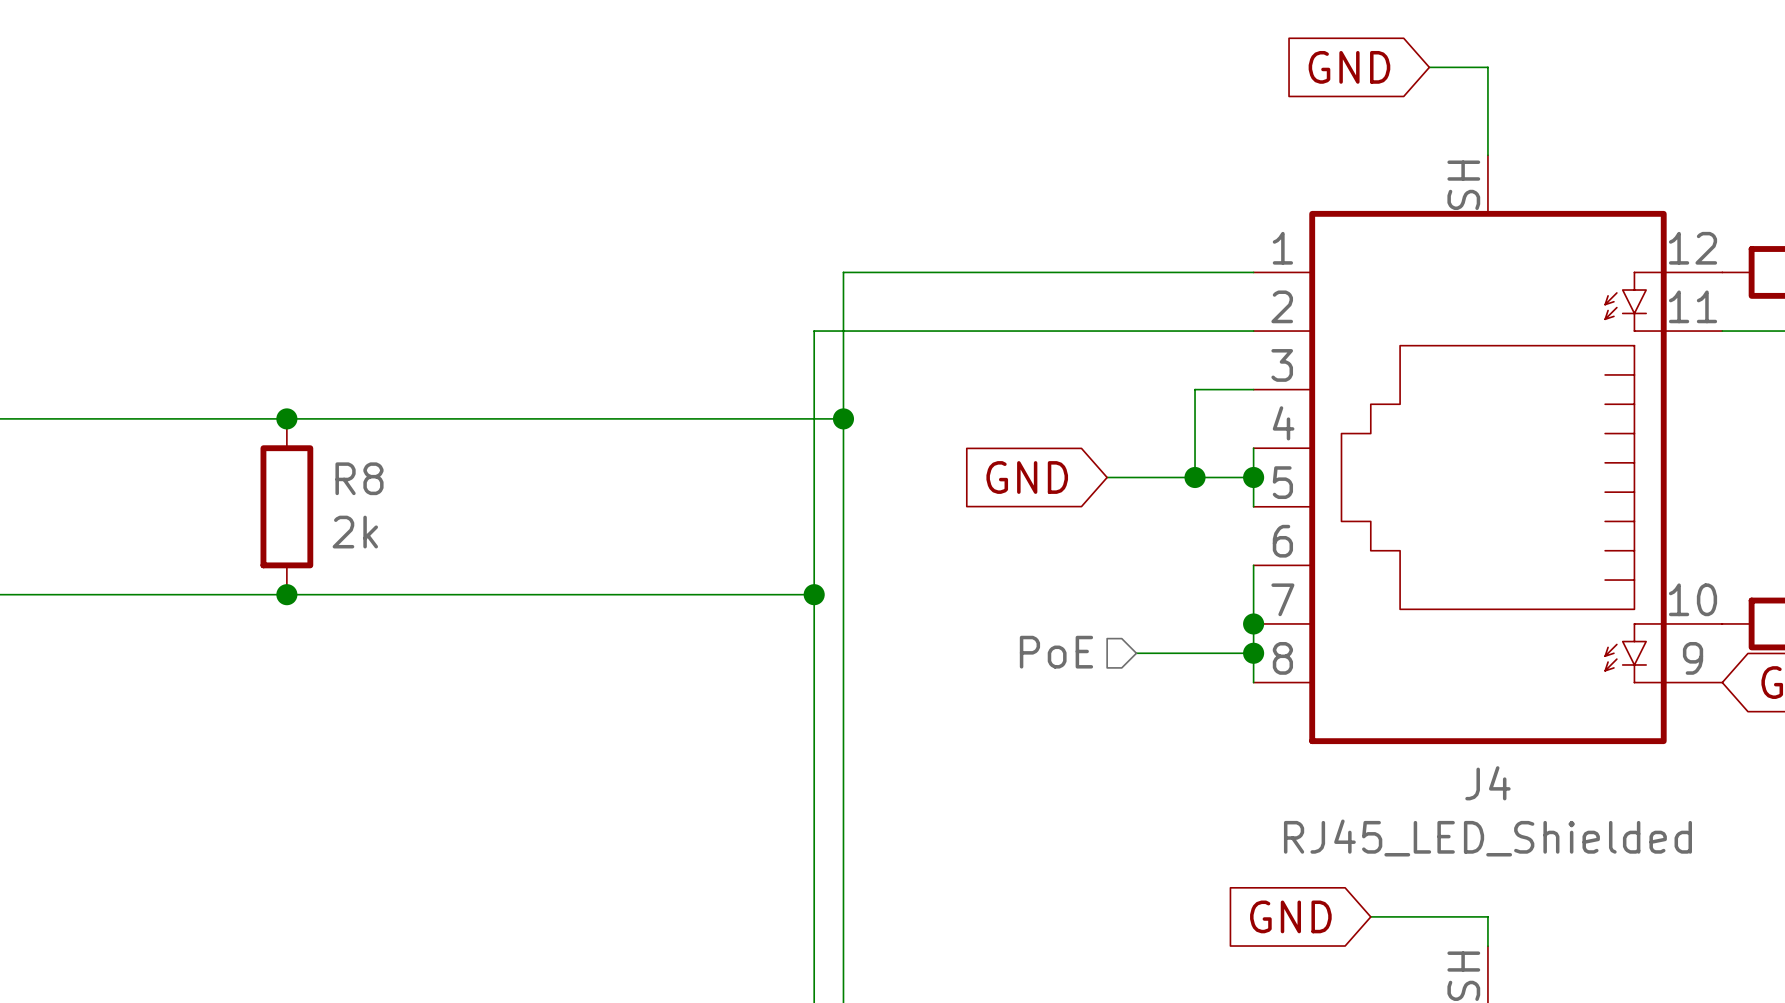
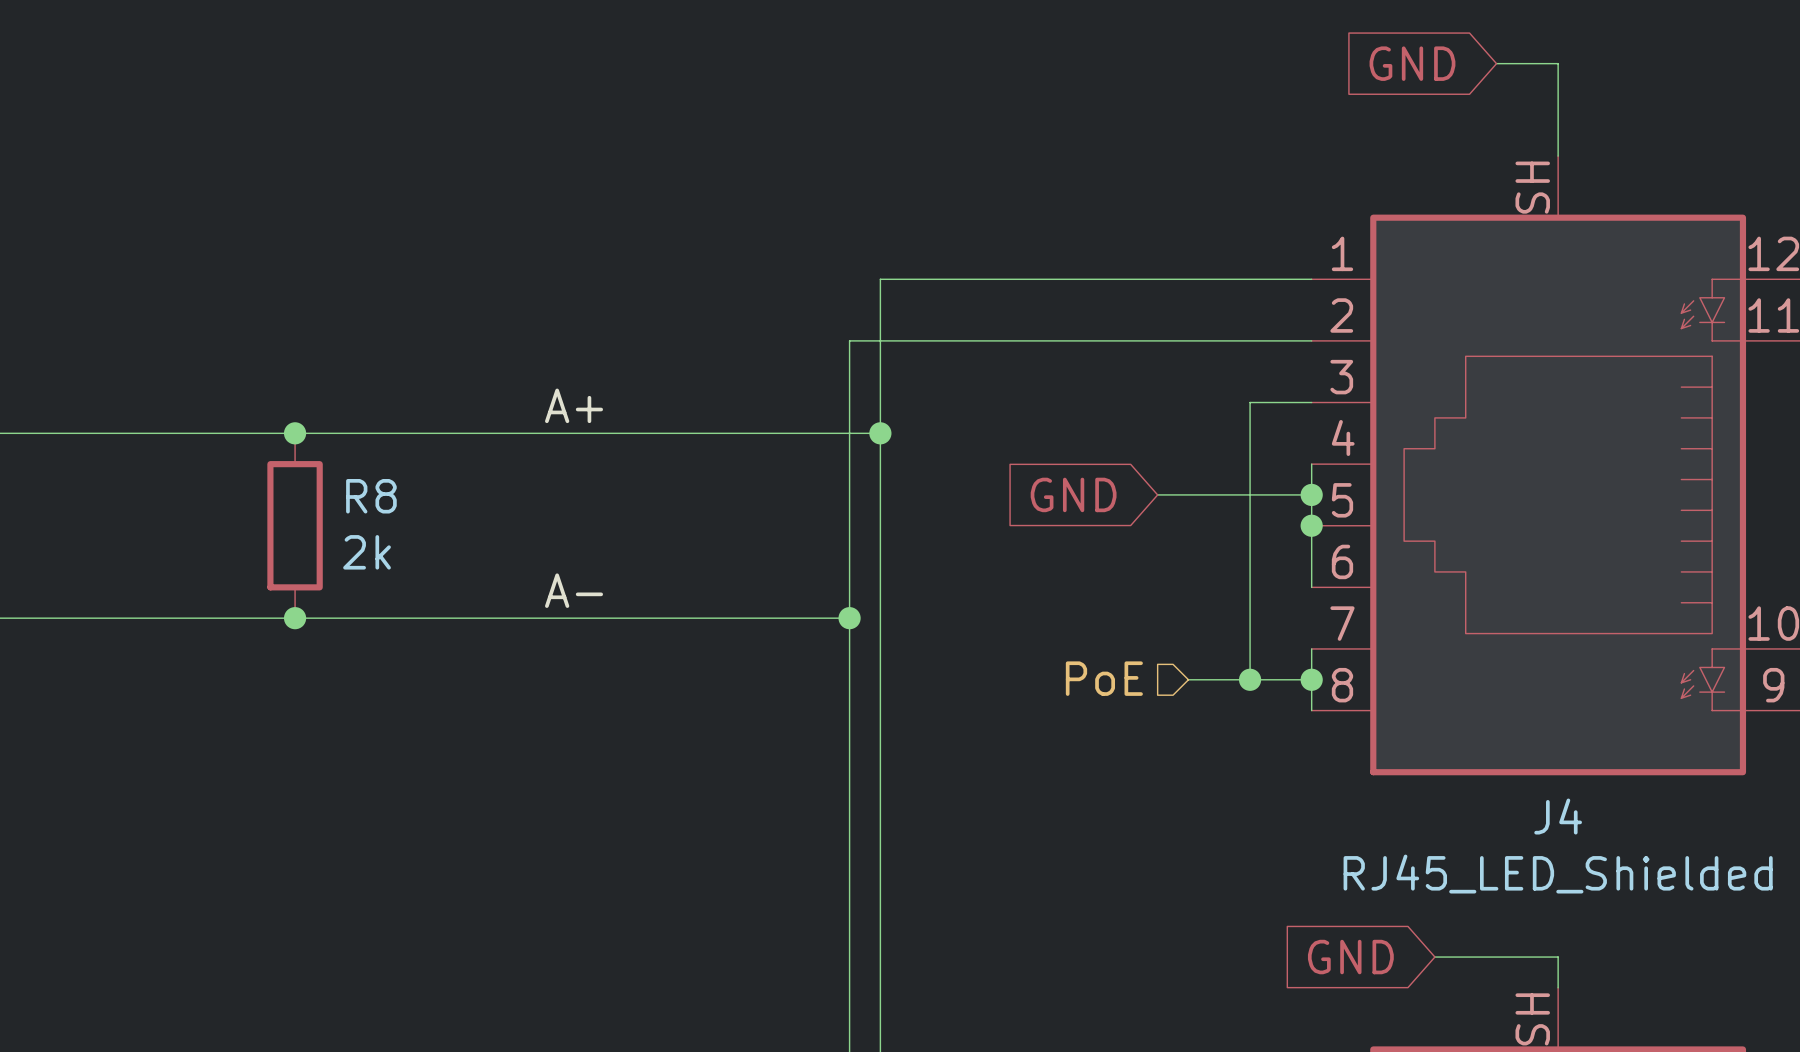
label: none -> A+ (574, 405)
wire: none -> (1250, 494) (1250, 679)
junction: (1195, 477) -> none
junction: none -> (1311, 525)
wire: (1253, 565) (1253, 623) -> (1311, 587) (1311, 525)
label: none -> A- (574, 590)
junction: (1253, 623) -> none
junction: none -> (1250, 679)

